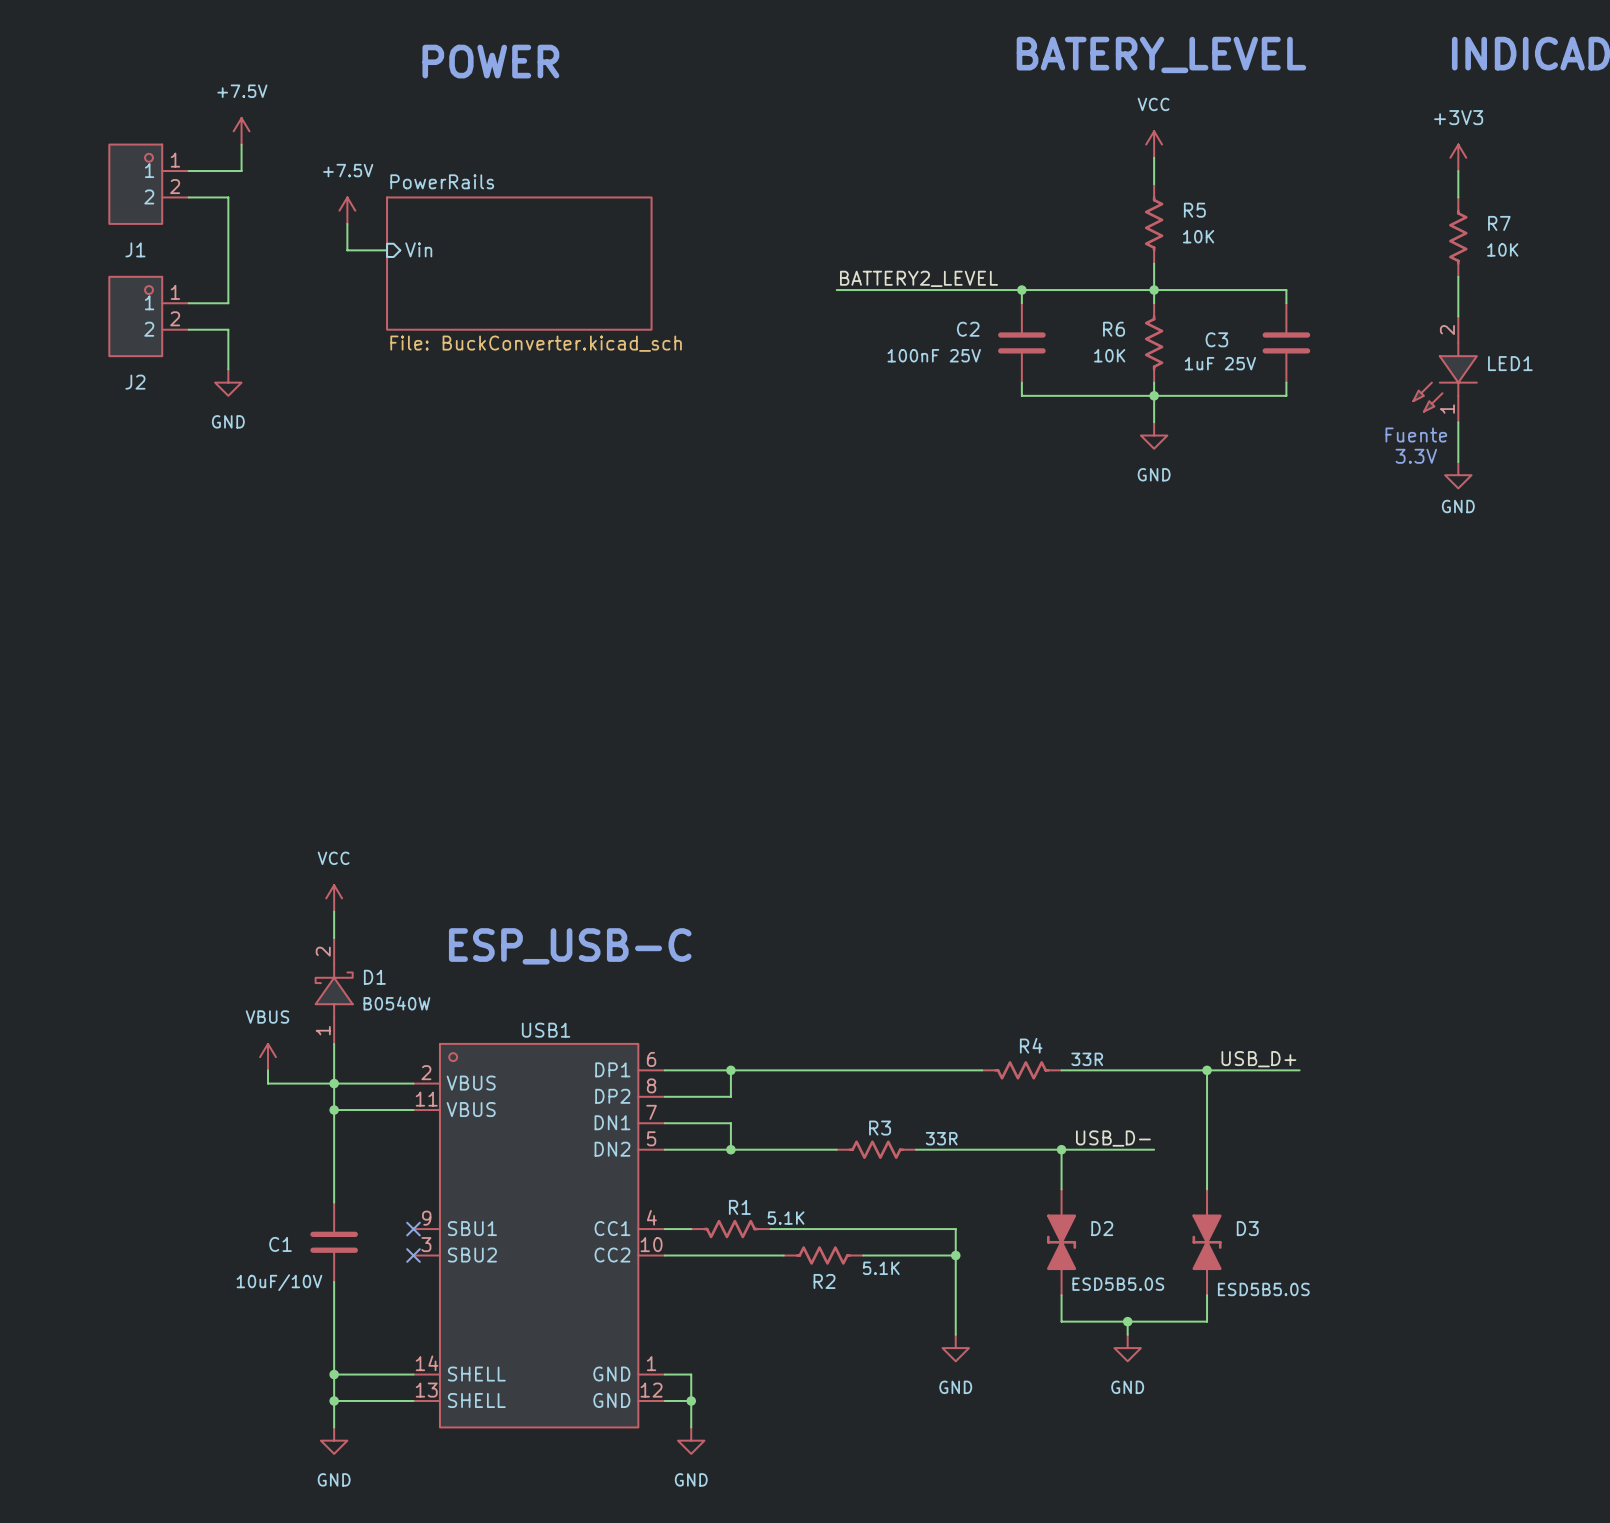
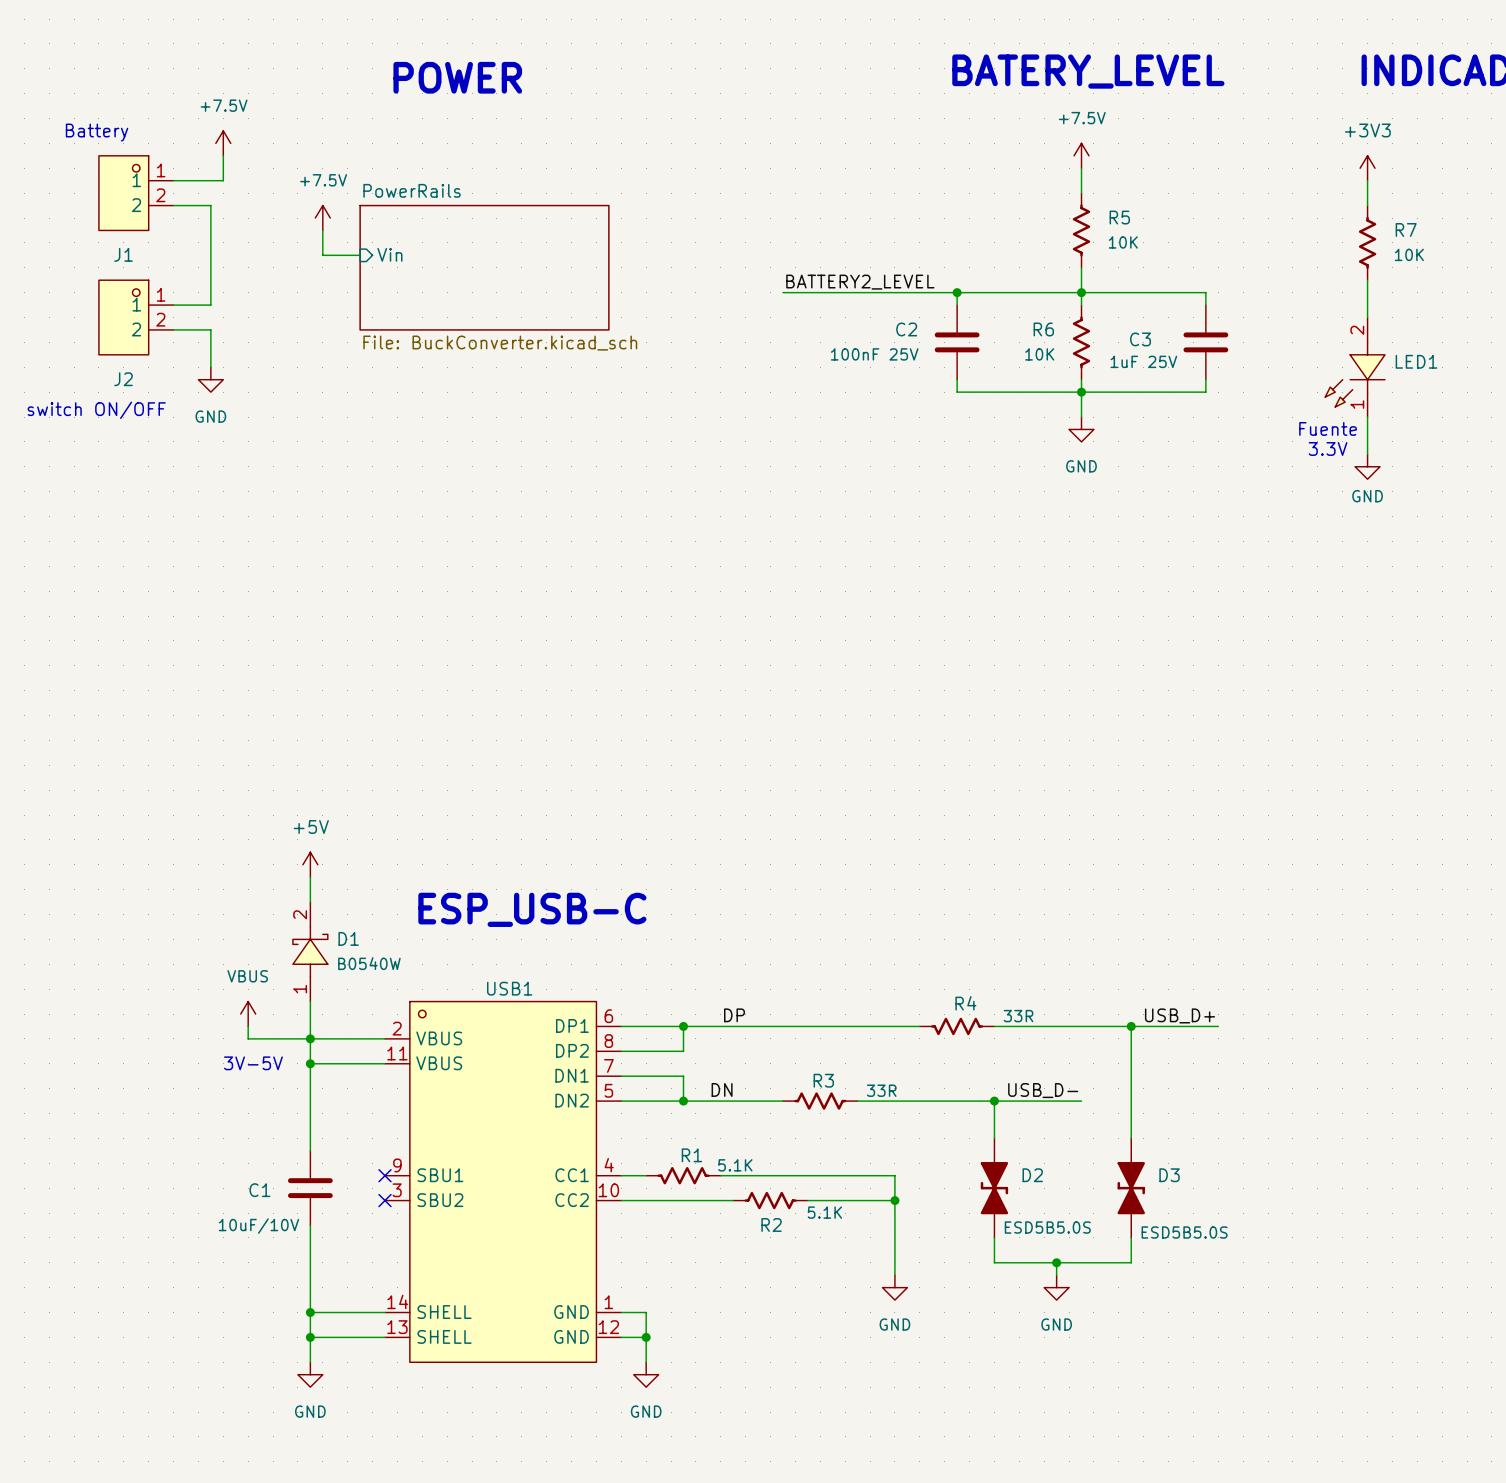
text: none -> Battery (97, 132)
power symbol: VCC (1154, 144) -> +7.5V (1081, 155)
text: none -> switch ON/OFF (96, 410)
power symbol: VCC (334, 898) -> +5V (310, 864)
label: none -> DP (734, 1015)
text: none -> 3V-5V (253, 1063)
label: none -> DN (722, 1089)

